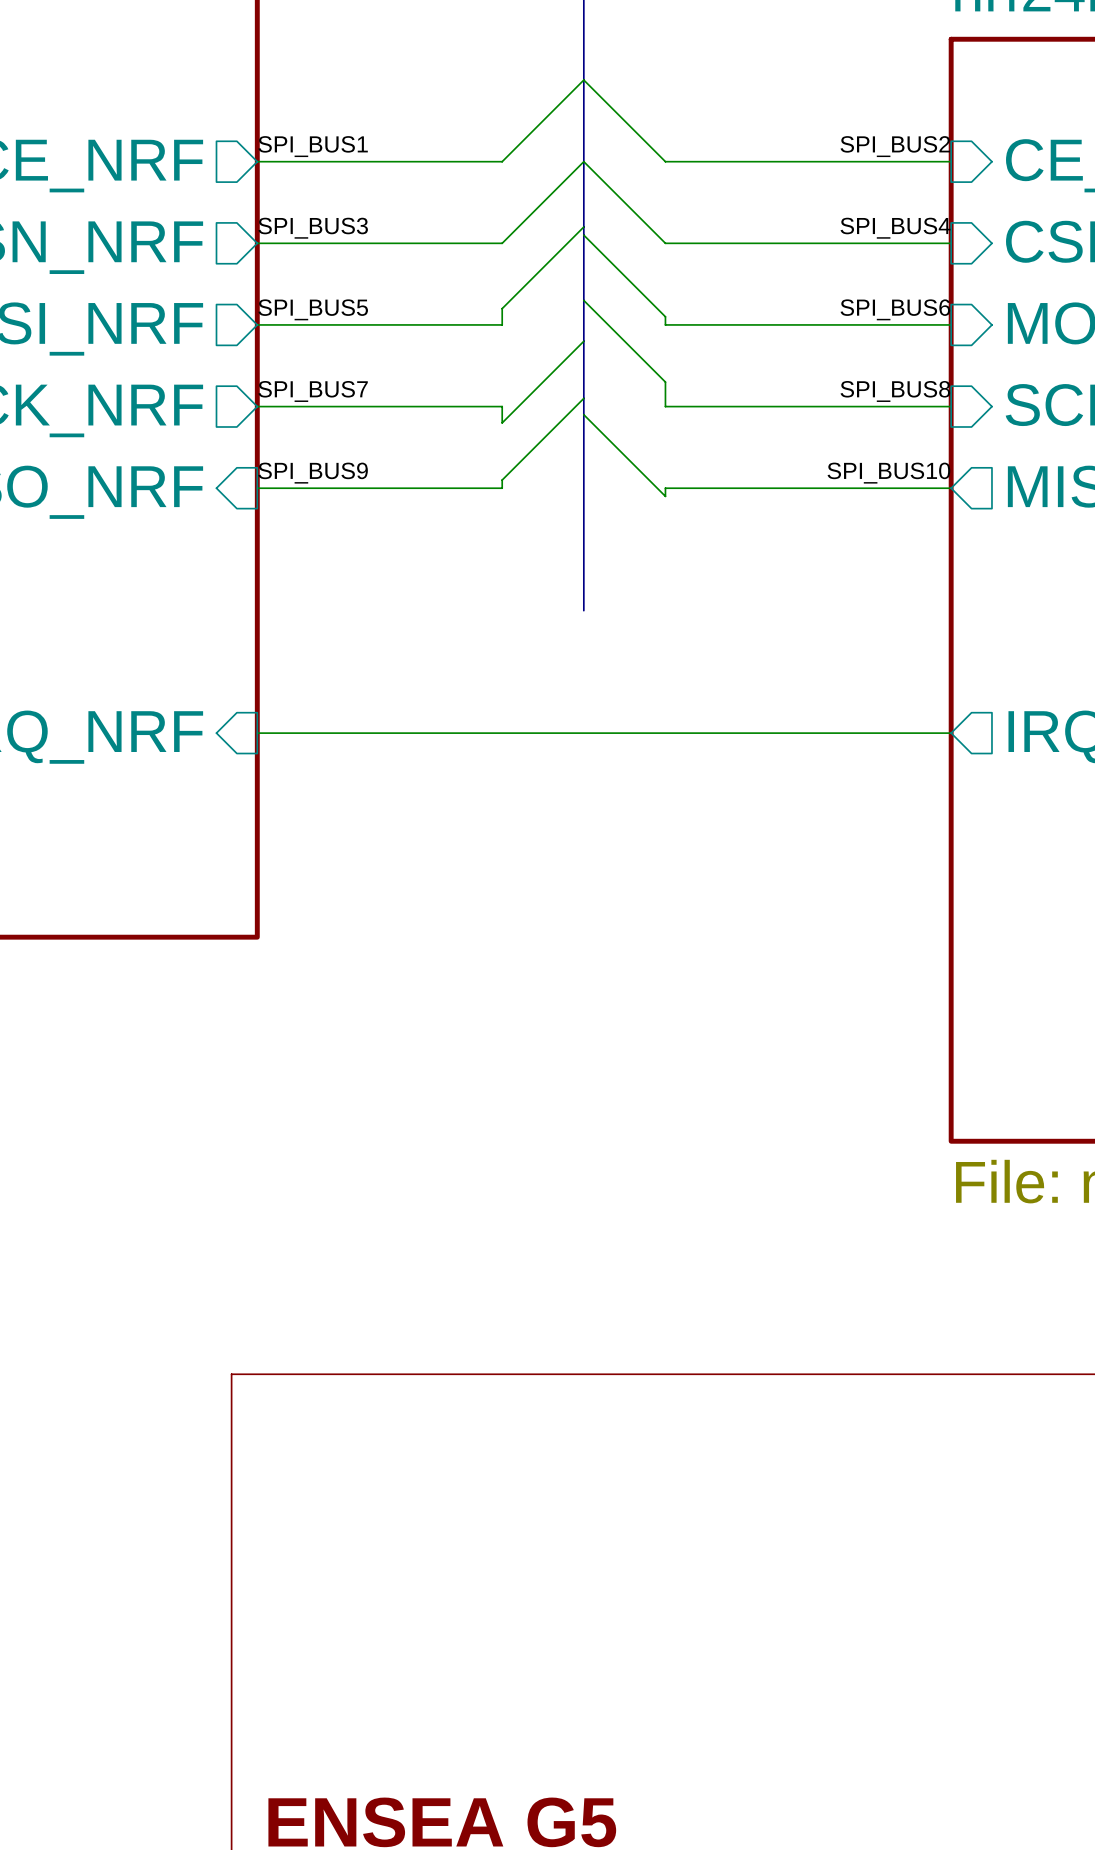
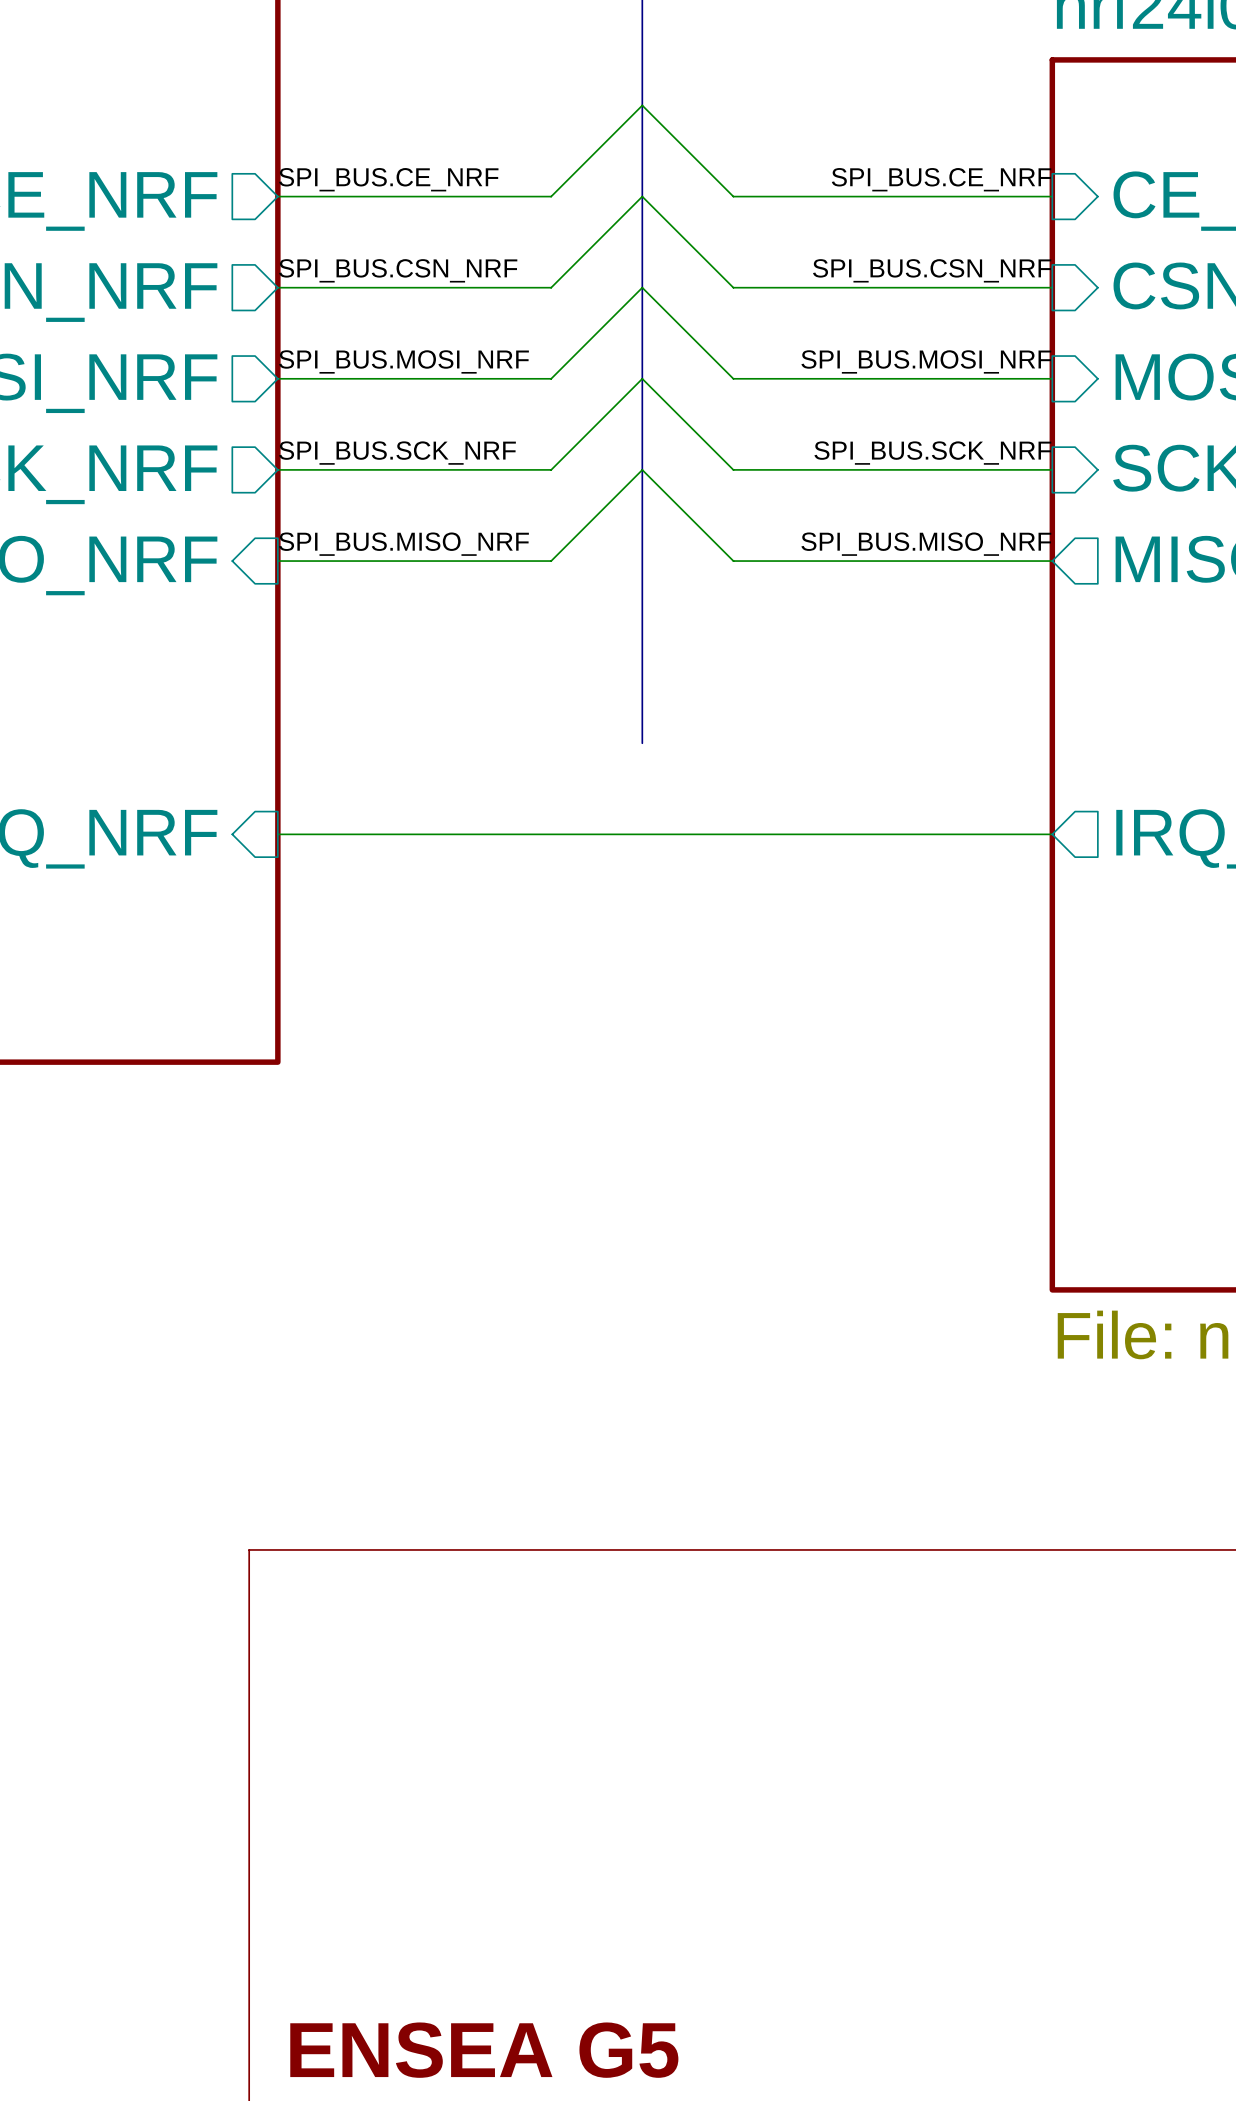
label: SPI_BUS1 (313, 146) -> SPI_BUS.CE_NRF (388, 179)
label: SPI_BUS2 (895, 146) -> SPI_BUS.CE_NRF (941, 179)
wire: (583, 227) (502, 308) (502, 324) -> none
label: SPI_BUS3 (313, 228) -> SPI_BUS.CSN_NRF (398, 270)
label: SPI_BUS4 (895, 228) -> SPI_BUS.CSN_NRF (932, 270)
wire: (583, 235) (665, 316) (665, 324) -> (551, 378) (642, 287) (733, 378)
wire: (583, 300) (665, 382) (665, 406) -> none
label: SPI_BUS5 (313, 309) -> SPI_BUS.MOSI_NRF (403, 361)
label: SPI_BUS6 (895, 309) -> SPI_BUS.MOSI_NRF (926, 361)
wire: (583, 341) (502, 422) (502, 406) -> (733, 469) (642, 378) (551, 469)
label: SPI_BUS7 (313, 391) -> SPI_BUS.SCK_NRF (397, 453)
label: SPI_BUS8 (895, 391) -> SPI_BUS.SCK_NRF (932, 453)
wire: (583, 398) (502, 480) (502, 488) -> none
wire: (583, 414) (665, 496) (665, 488) -> (551, 561) (642, 469) (733, 561)
label: SPI_BUS9 (313, 473) -> SPI_BUS.MISO_NRF (403, 544)
label: SPI_BUS10 (888, 473) -> SPI_BUS.MISO_NRF (926, 544)
bus: none -> (642, 697) (642, 743)

